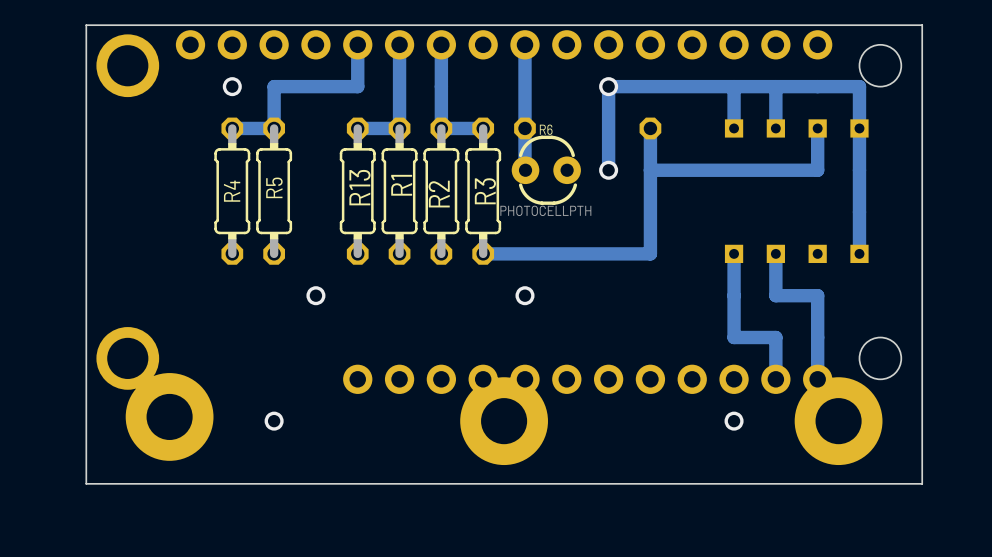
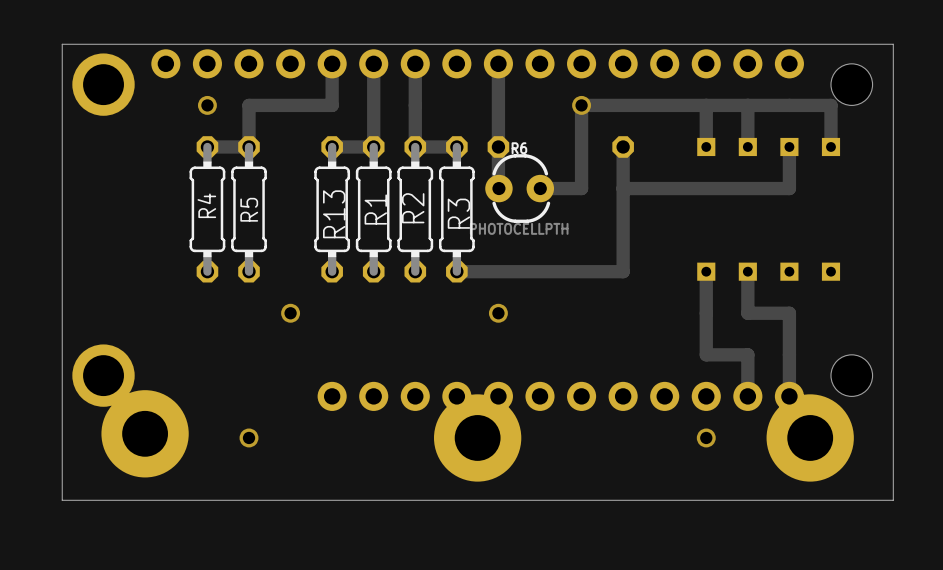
track: (859, 128) (859, 253) -> none
track: none -> (581, 188) (540, 188)
via: (608, 170) -> none

